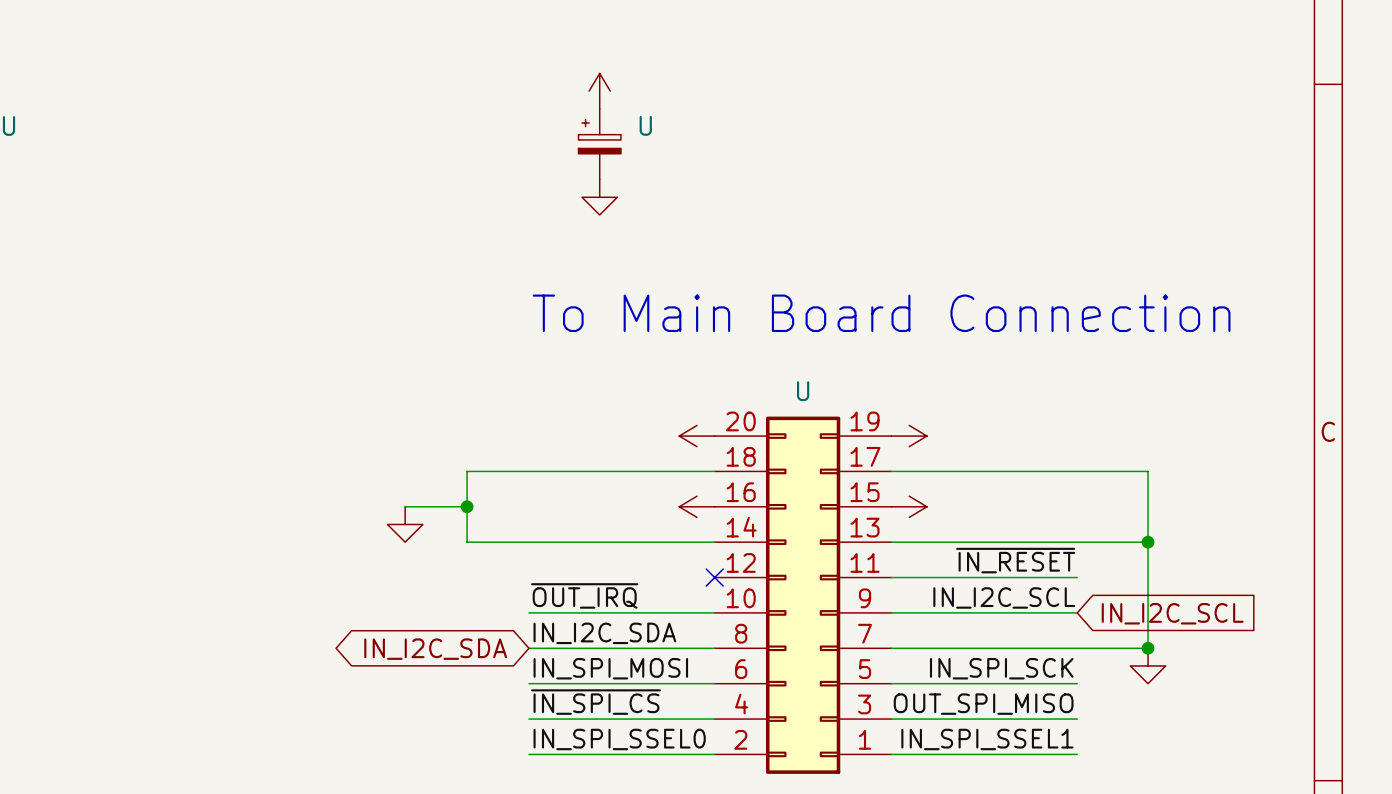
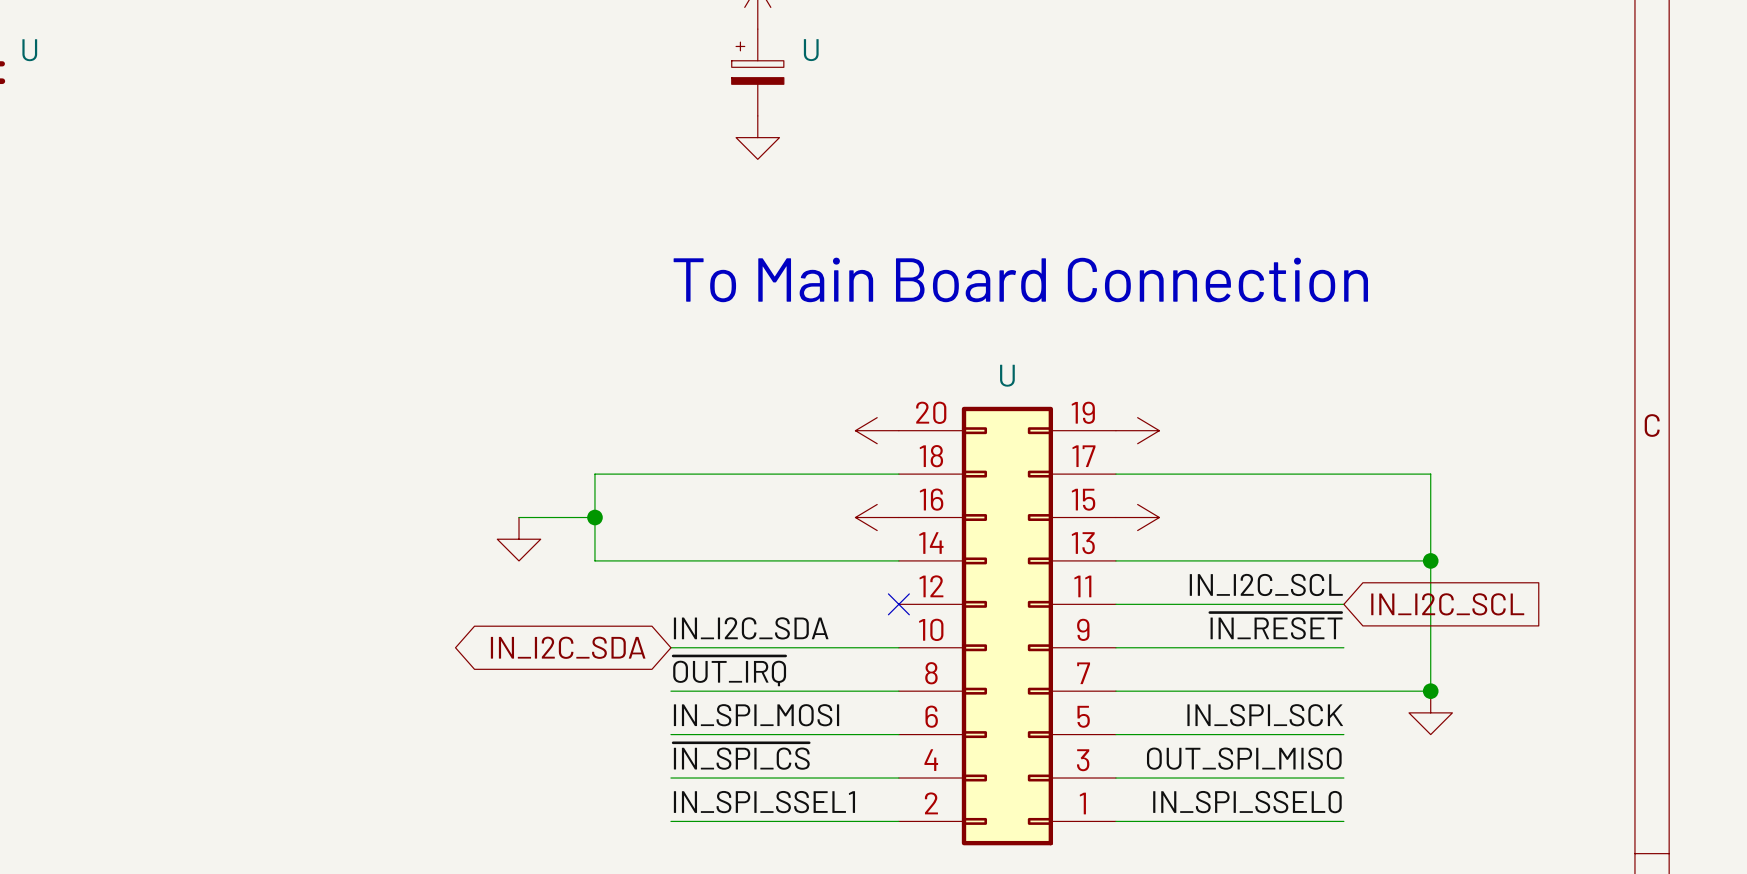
label: ~{IN_RESET} (1015, 560) -> IN_I2C_SCL (1266, 584)
label: ~{OUT_IRQ} (584, 595) -> IN_I2C_SDA (751, 628)
label: IN_I2C_SCL (1004, 597) -> ~{IN_RESET} (1276, 626)
global label position: IN_I2C_SCL (1172, 613) -> IN_I2C_SCL (1447, 604)
label: IN_I2C_SDA (604, 633) -> ~{OUT_IRQ} (729, 671)
global label position: IN_I2C_SDA (435, 649) -> IN_I2C_SDA (568, 647)
label: IN_SPI_SSEL0 (619, 739) -> IN_SPI_SSEL1 (764, 802)
label: IN_SPI_SSEL1 (987, 739) -> IN_SPI_SSEL0 (1247, 802)

